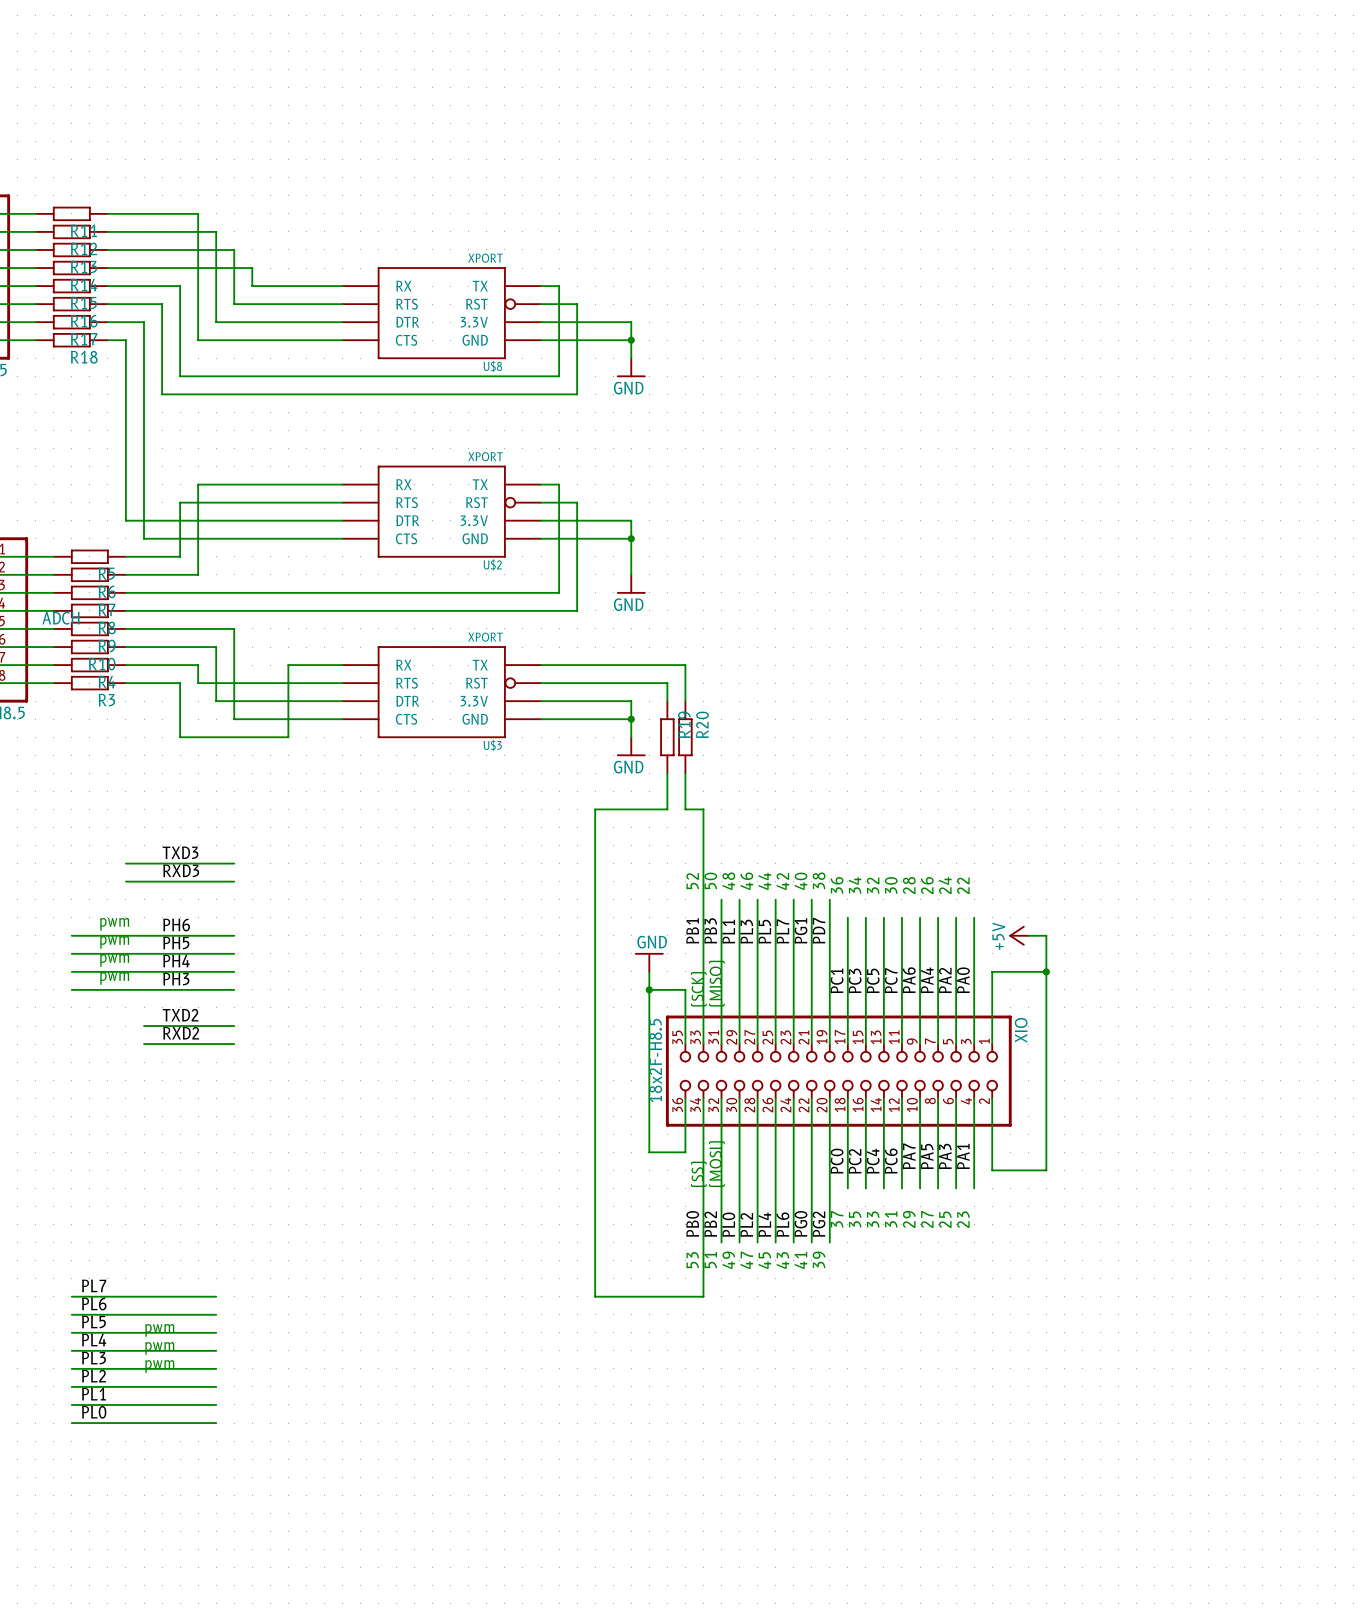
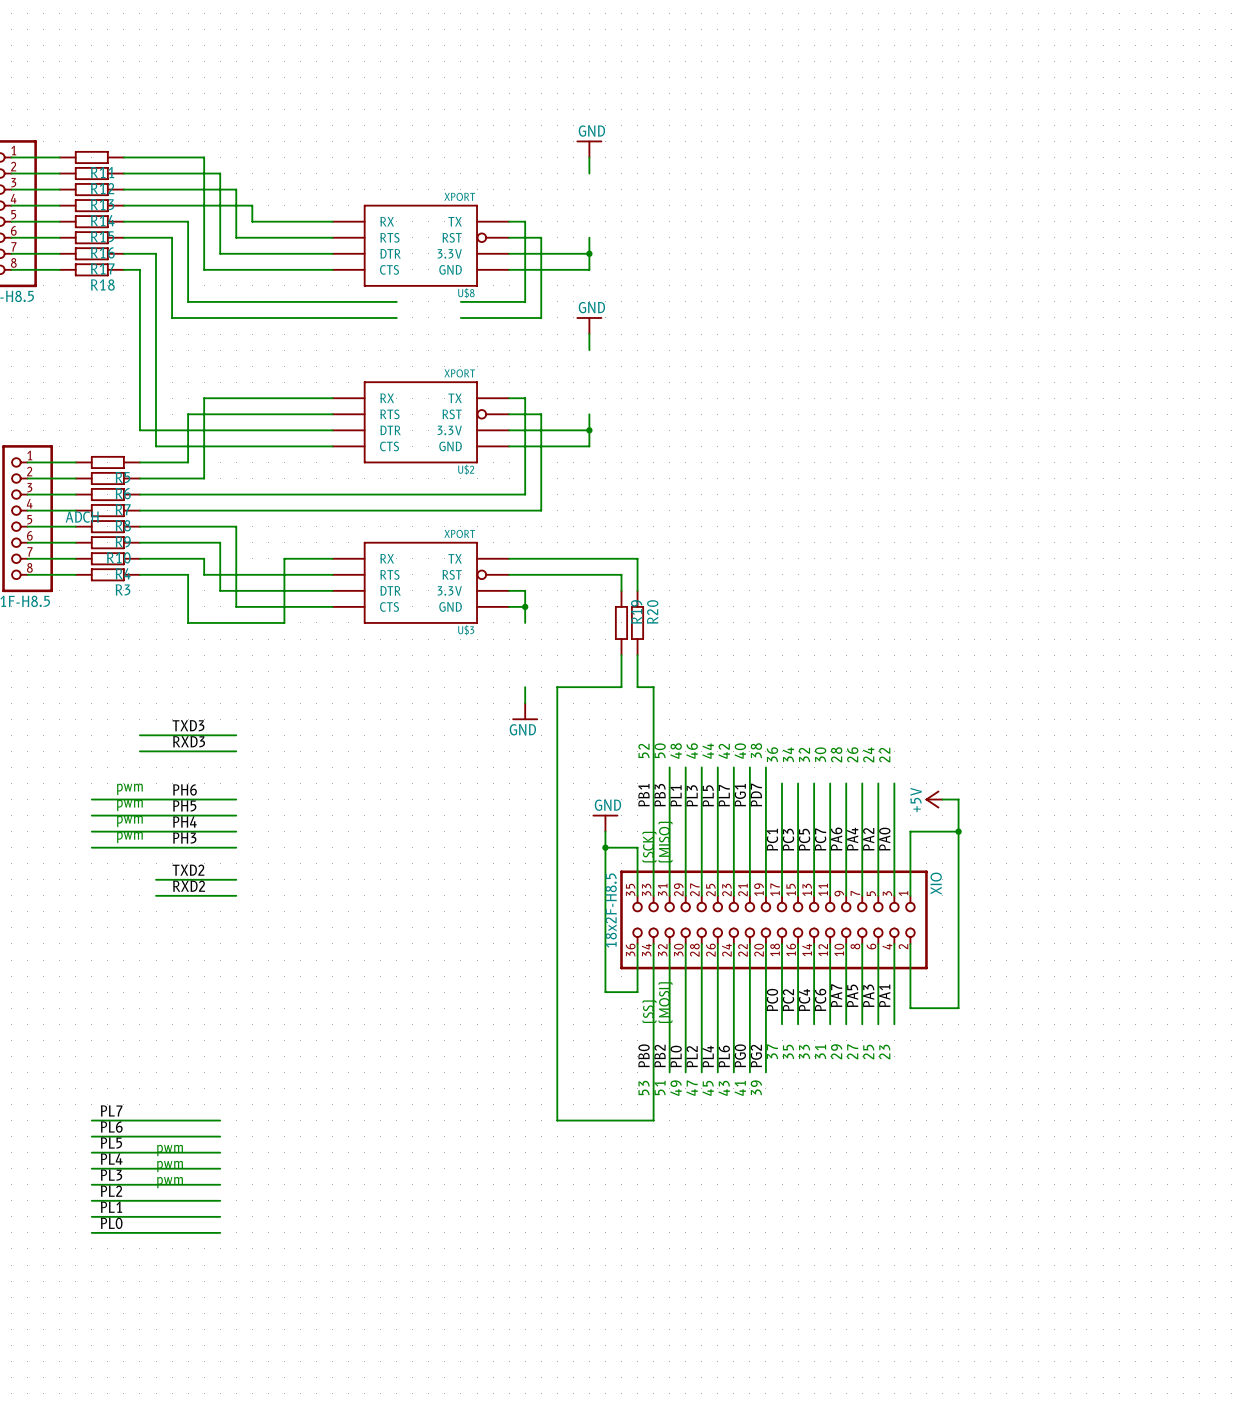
power symbol: none -> GND (589, 149)
wire: none -> (589, 157) (589, 173)
wire: (631, 340) (631, 358) -> (589, 237) (589, 253)
junction position: (631, 340) -> (589, 253)
power symbol position: GND (631, 367) -> GND (589, 325)
wire: (414, 376) (486, 376) -> none
power symbol rotation: 0° (631, 376) -> 180° (589, 317)
wire: (414, 394) (486, 394) -> none
wire: none -> (589, 334) (589, 350)
wire: none -> (589, 414) (589, 430)
wire: (631, 538) (631, 574) -> none
junction position: (631, 538) -> (589, 430)
power symbol: GND (631, 584) -> none
wire: (559, 701) (631, 701) (631, 737) -> (525, 590) (525, 622)
wire: (559, 719) (631, 719) -> none
junction: none -> (525, 606)
junction: (631, 719) -> none
power symbol position: GND (631, 746) -> GND (525, 711)
wire: none -> (525, 687) (525, 703)

